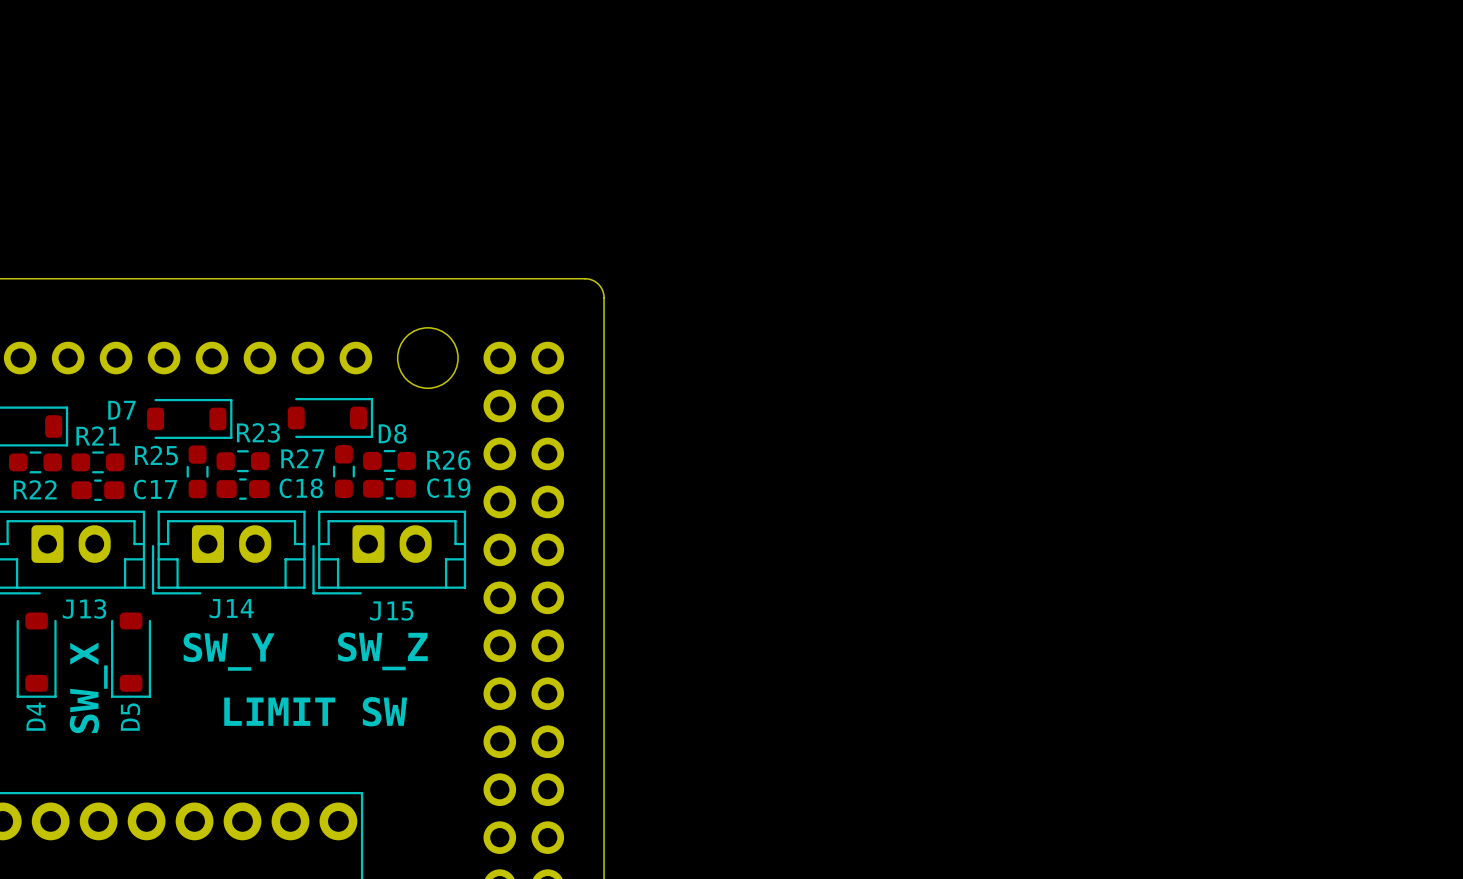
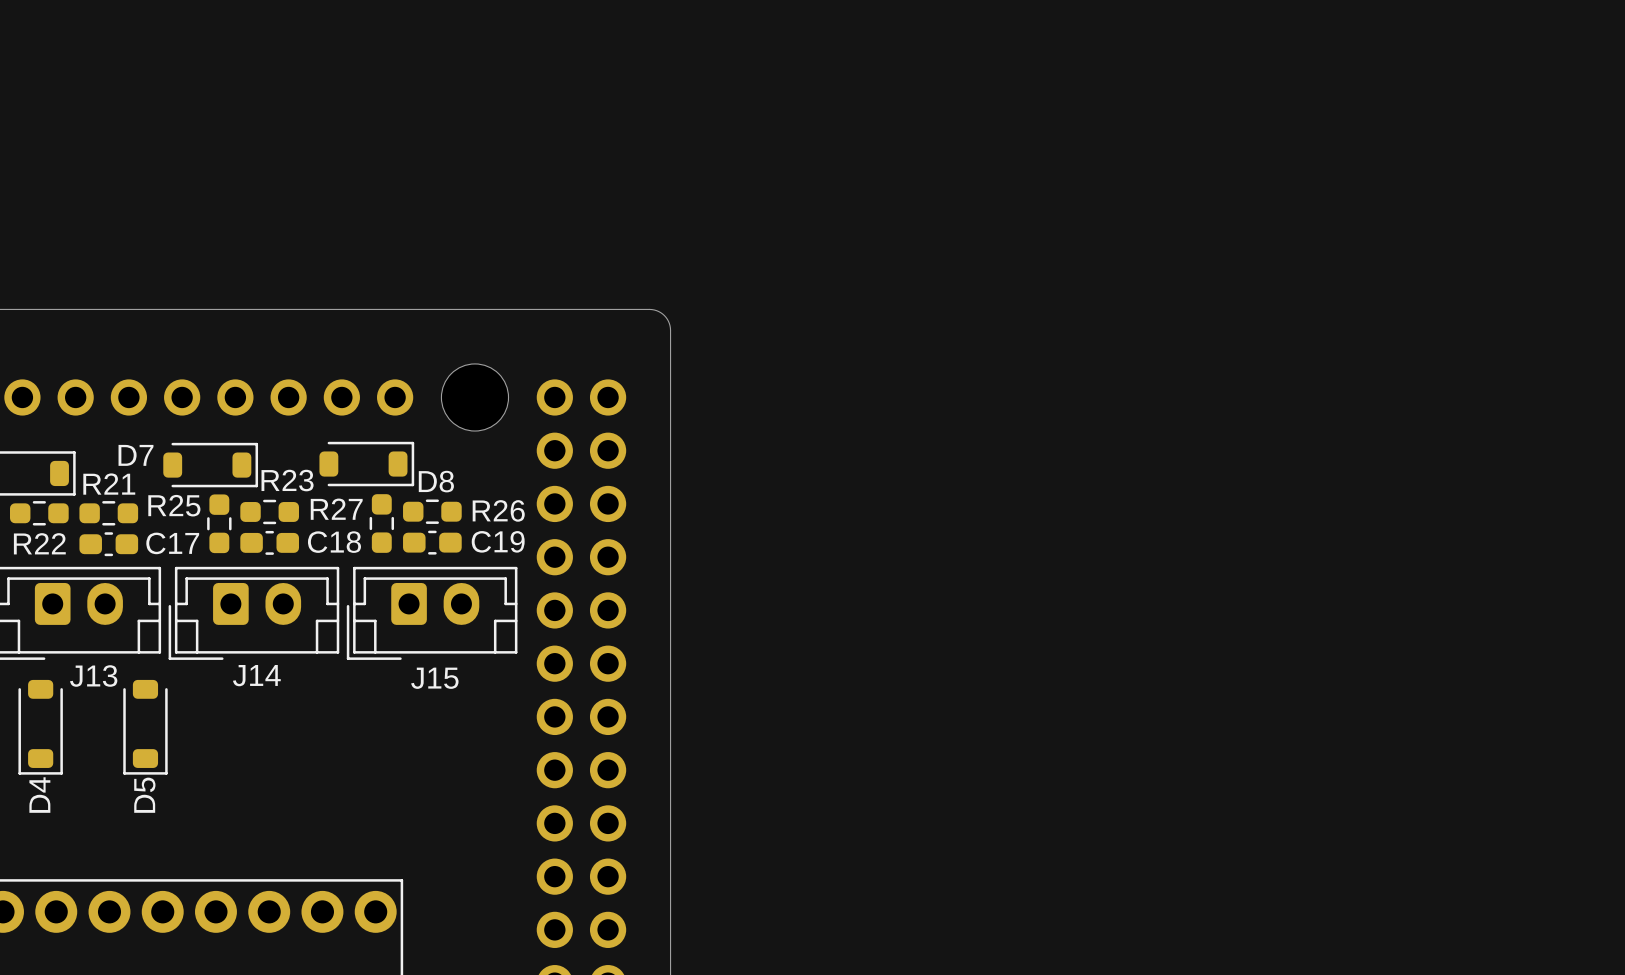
text: SW_Y (229, 651) -> none
text: SW_Z (382, 651) -> none
text: SW_X (88, 687) -> none
text: LIMIT SW (315, 711) -> none

